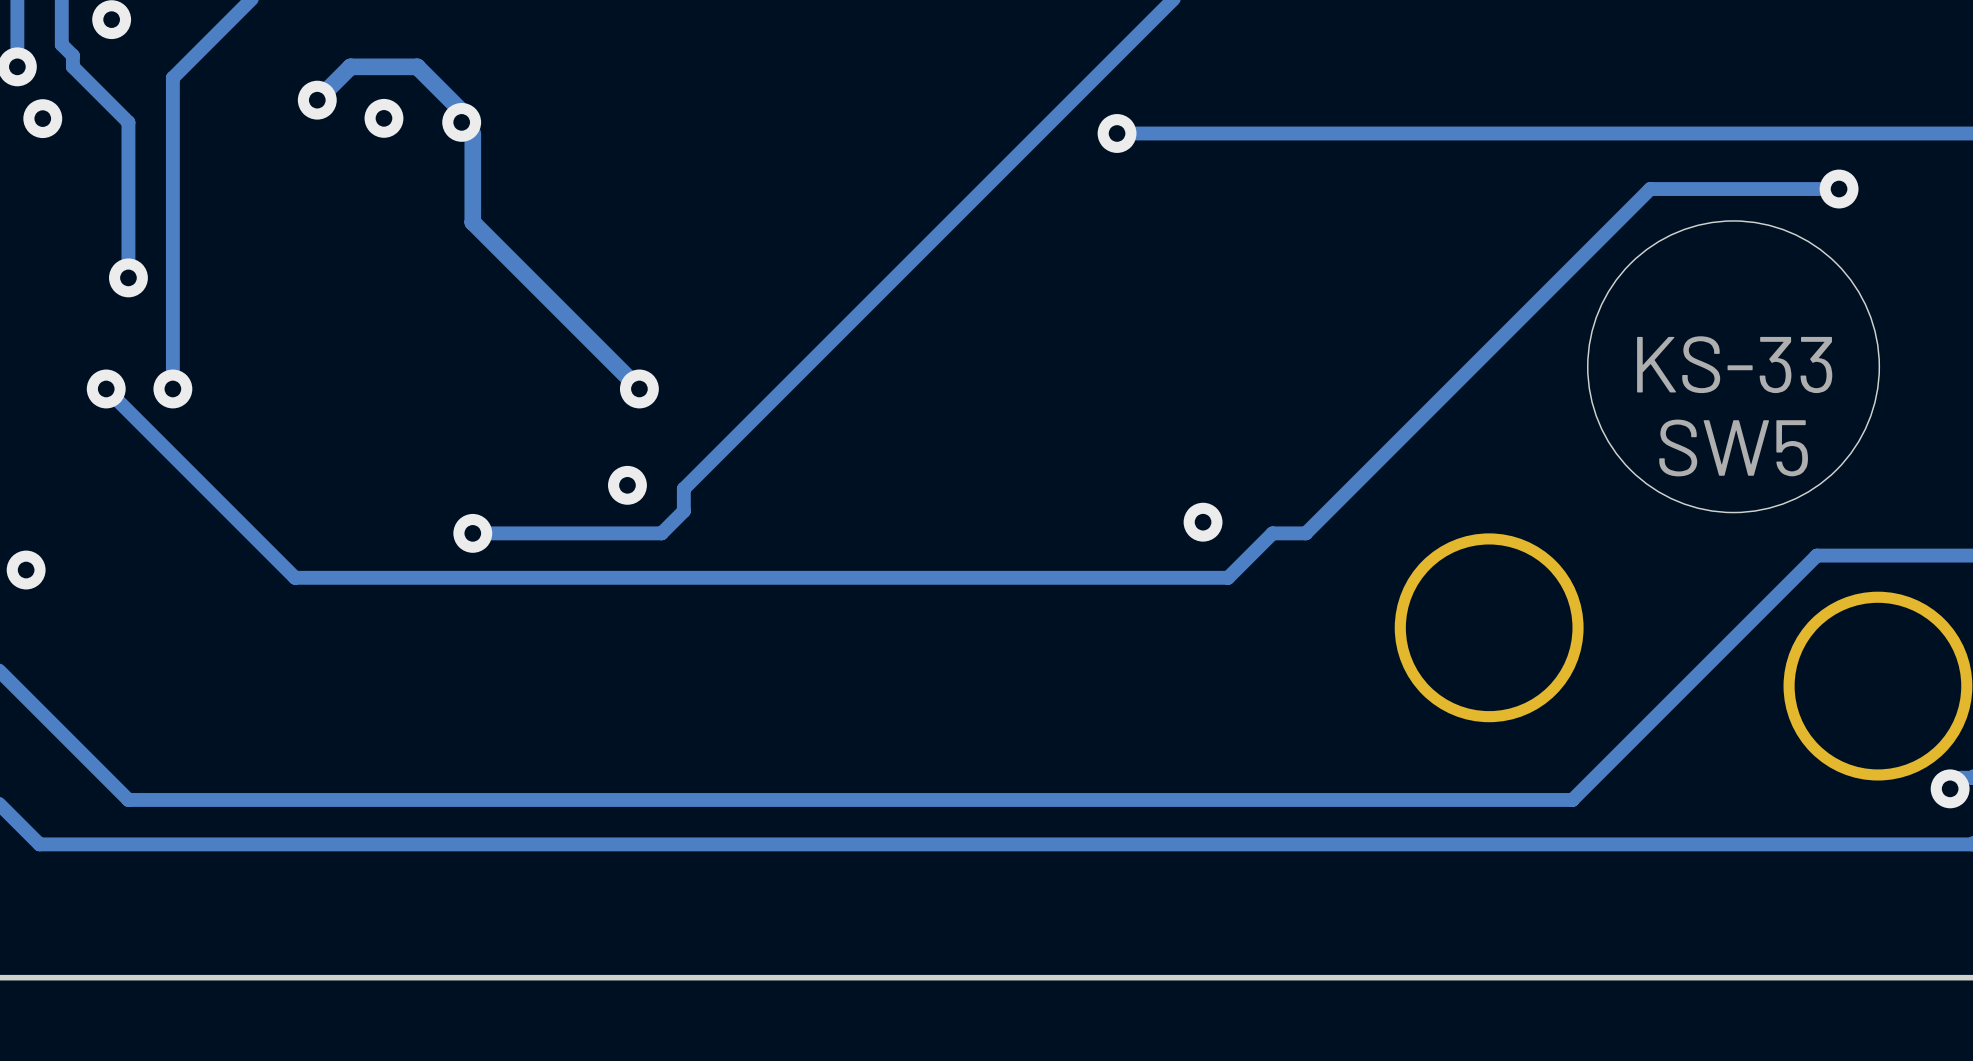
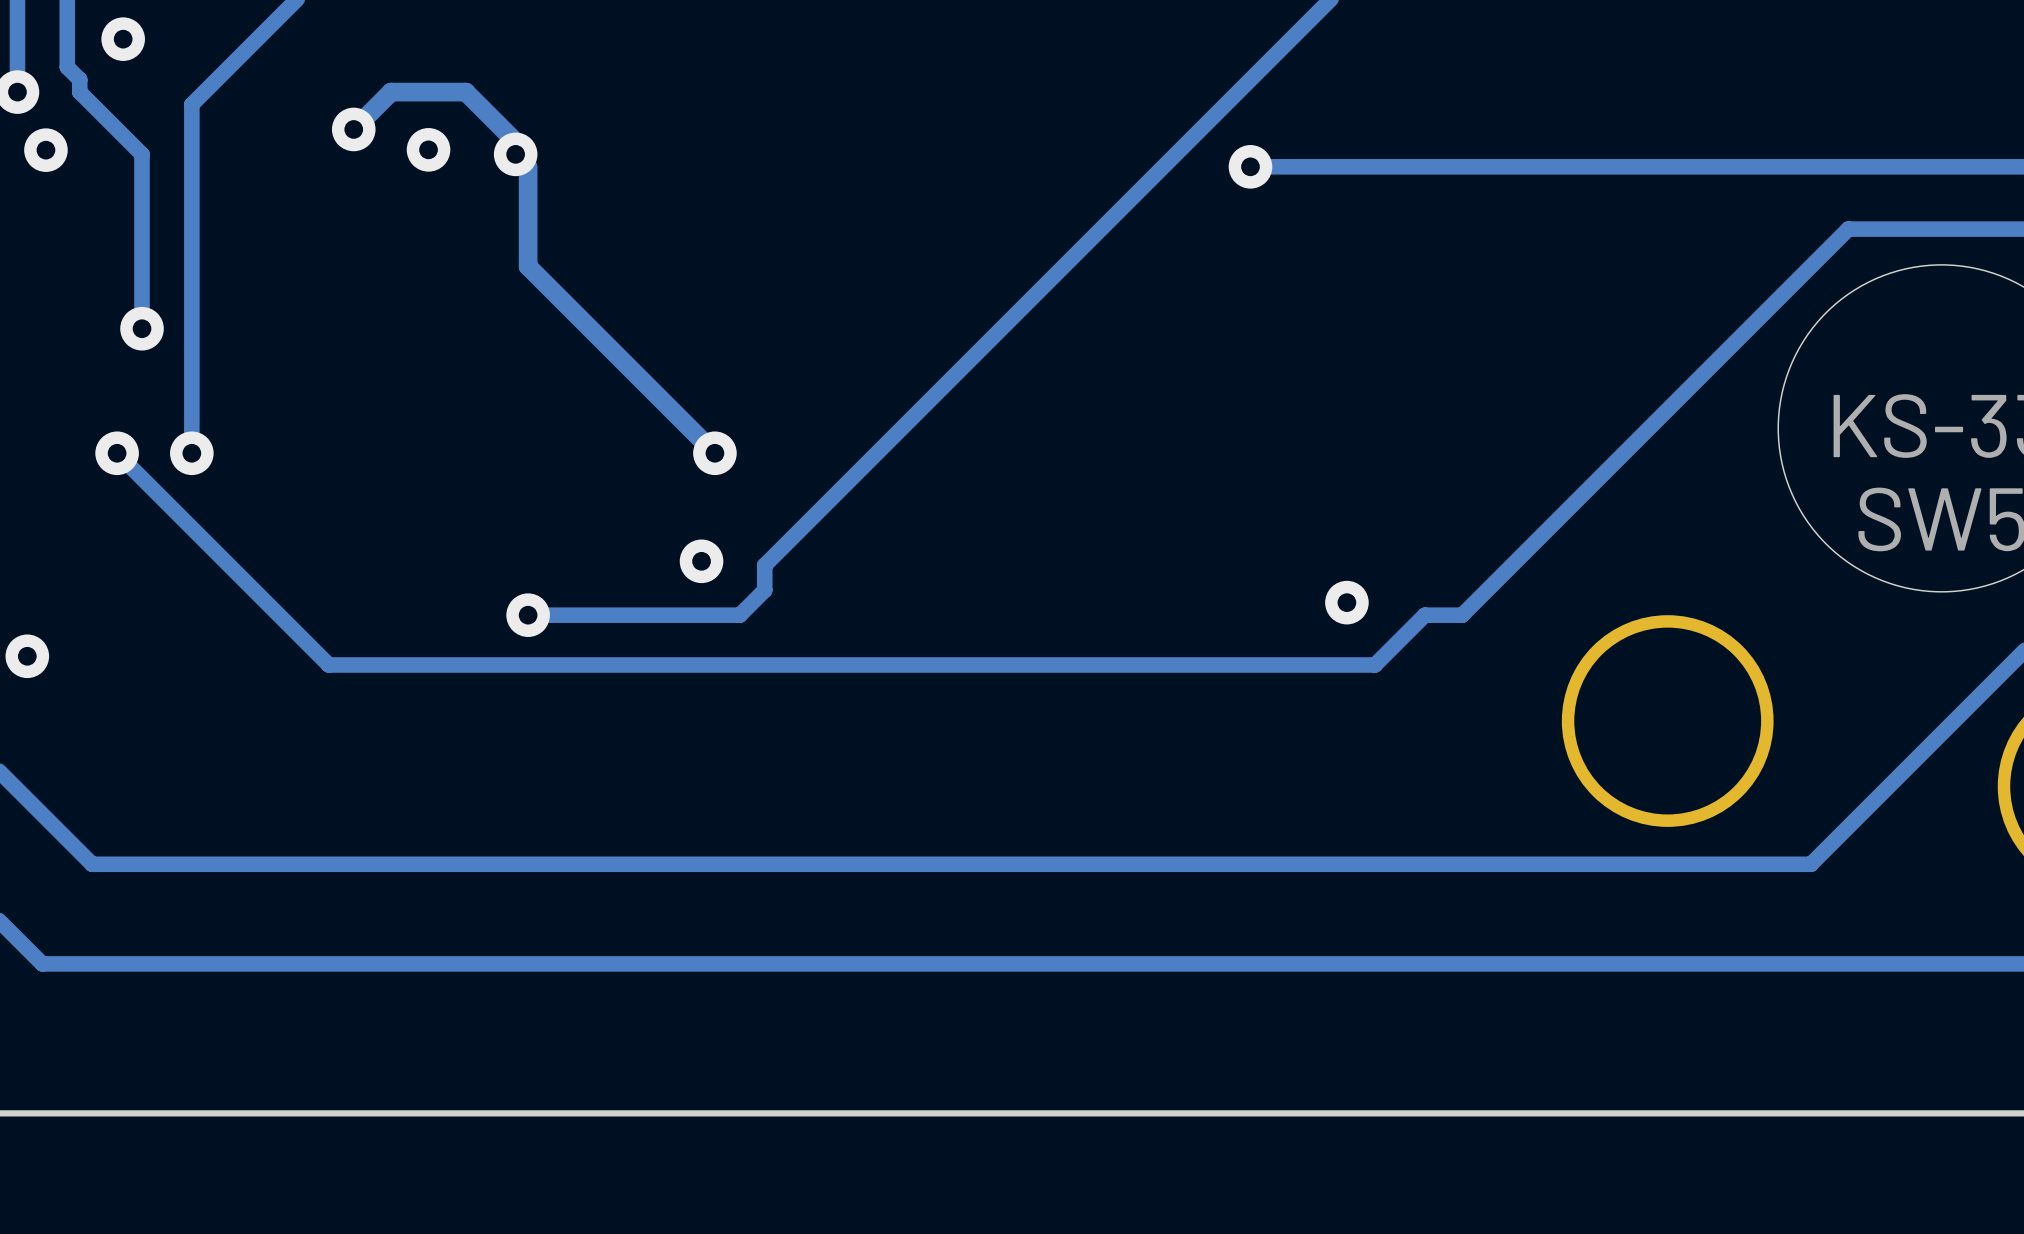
track: (1616, 755) (1572, 799) (128, 799) (84, 755) -> (1810, 864) (92, 864)

